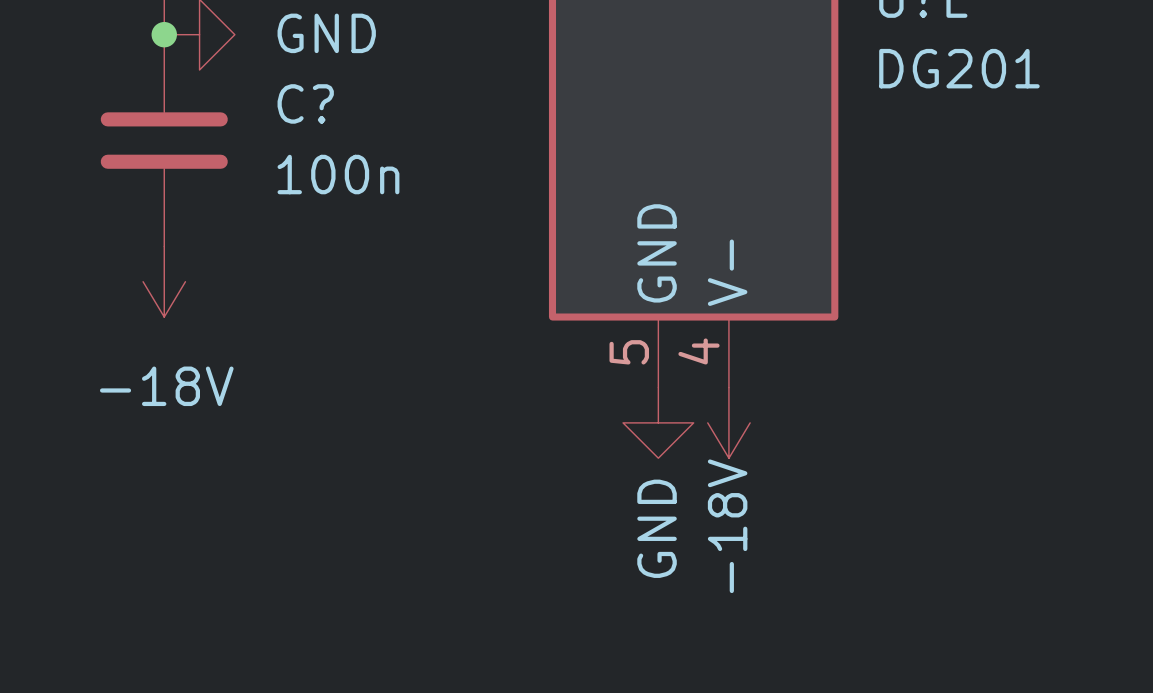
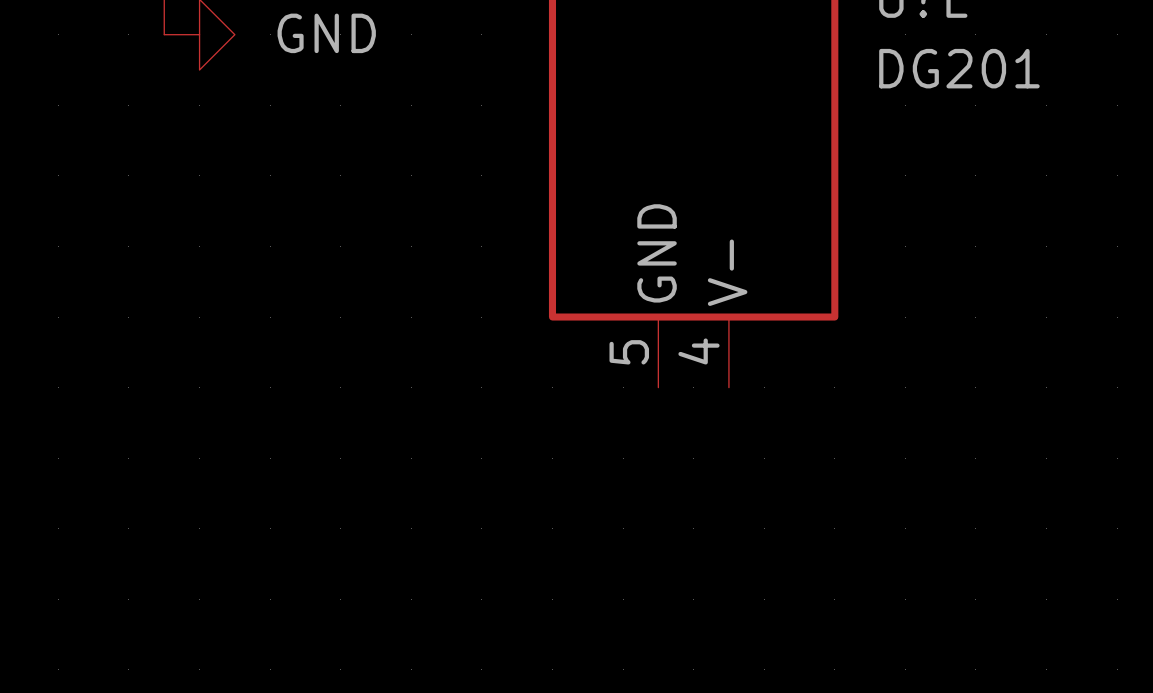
junction: (164, 34) -> none
C?: 100n (164, 140) -> none
power symbol: -18V (164, 281) -> none
power symbol: GND (658, 422) -> none
power symbol: -18V (728, 422) -> none

